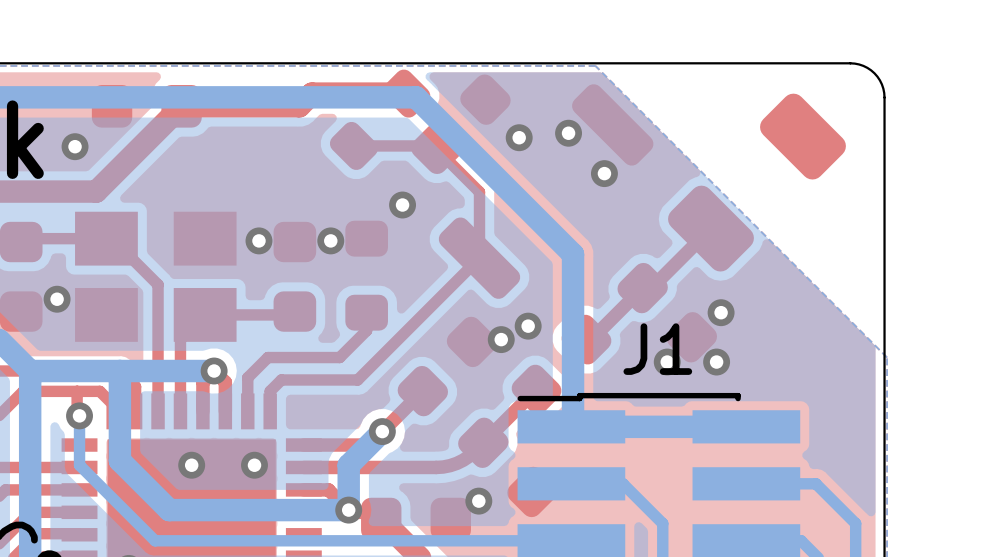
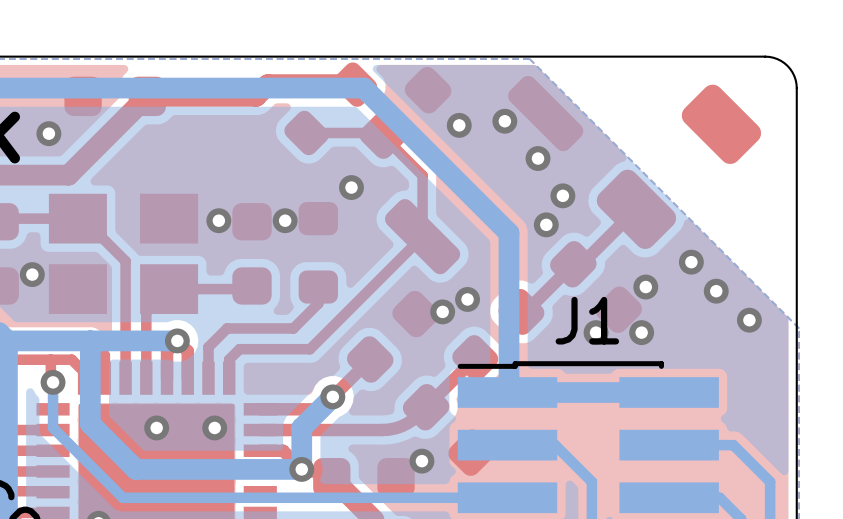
via: none -> (562, 195)
via: none -> (546, 224)
via: none -> (691, 262)
via: none -> (716, 291)
via: none -> (749, 320)

